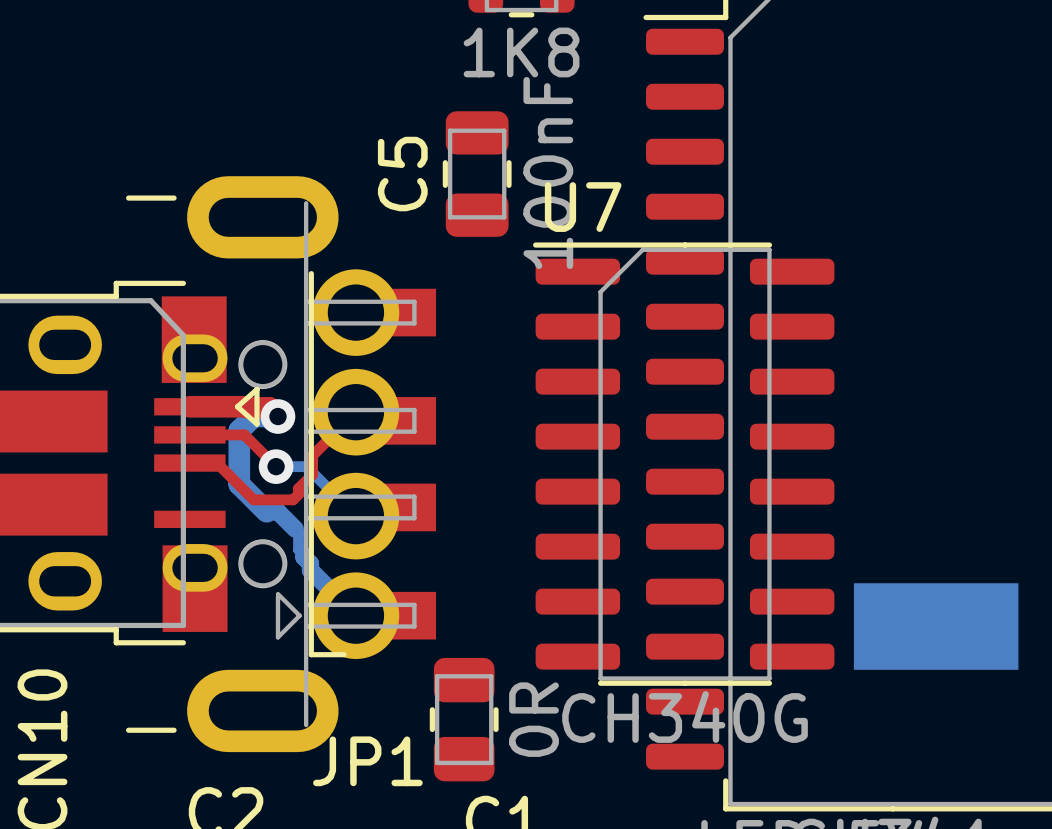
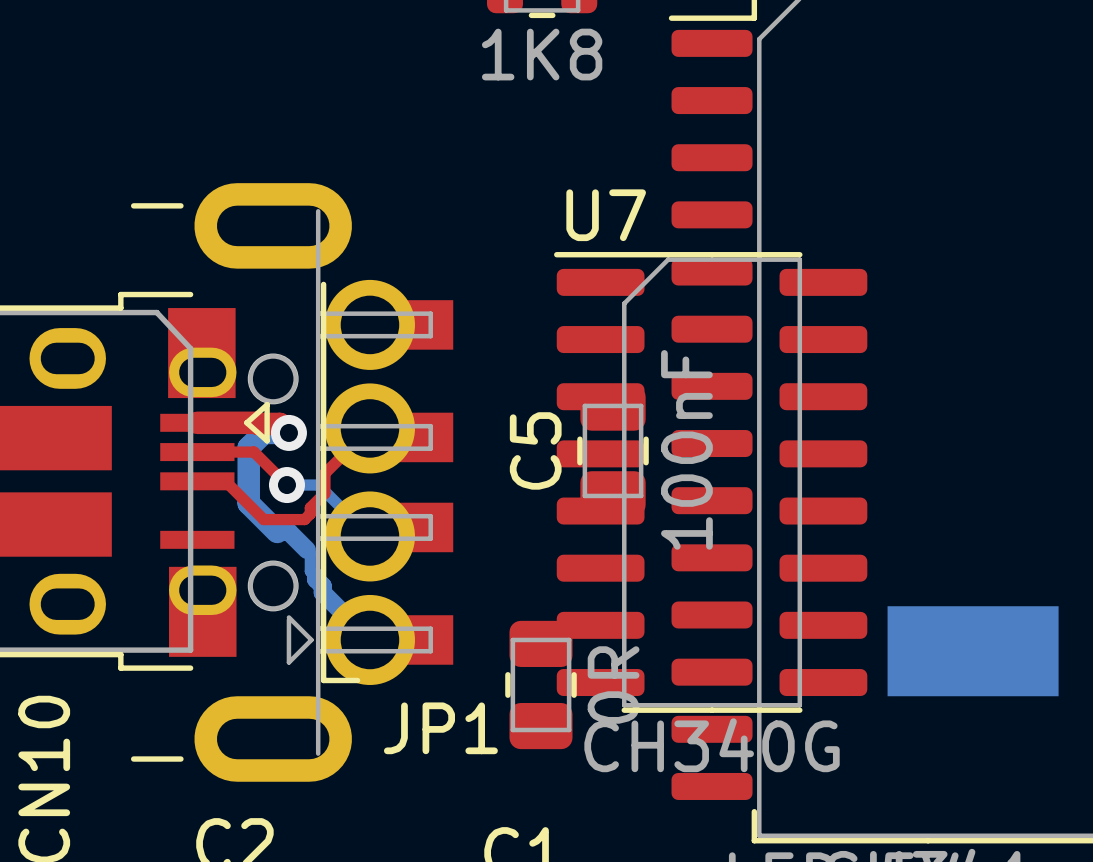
C5 position: (477, 174) -> (613, 450)
JP1 position: (464, 719) -> (540, 684)

